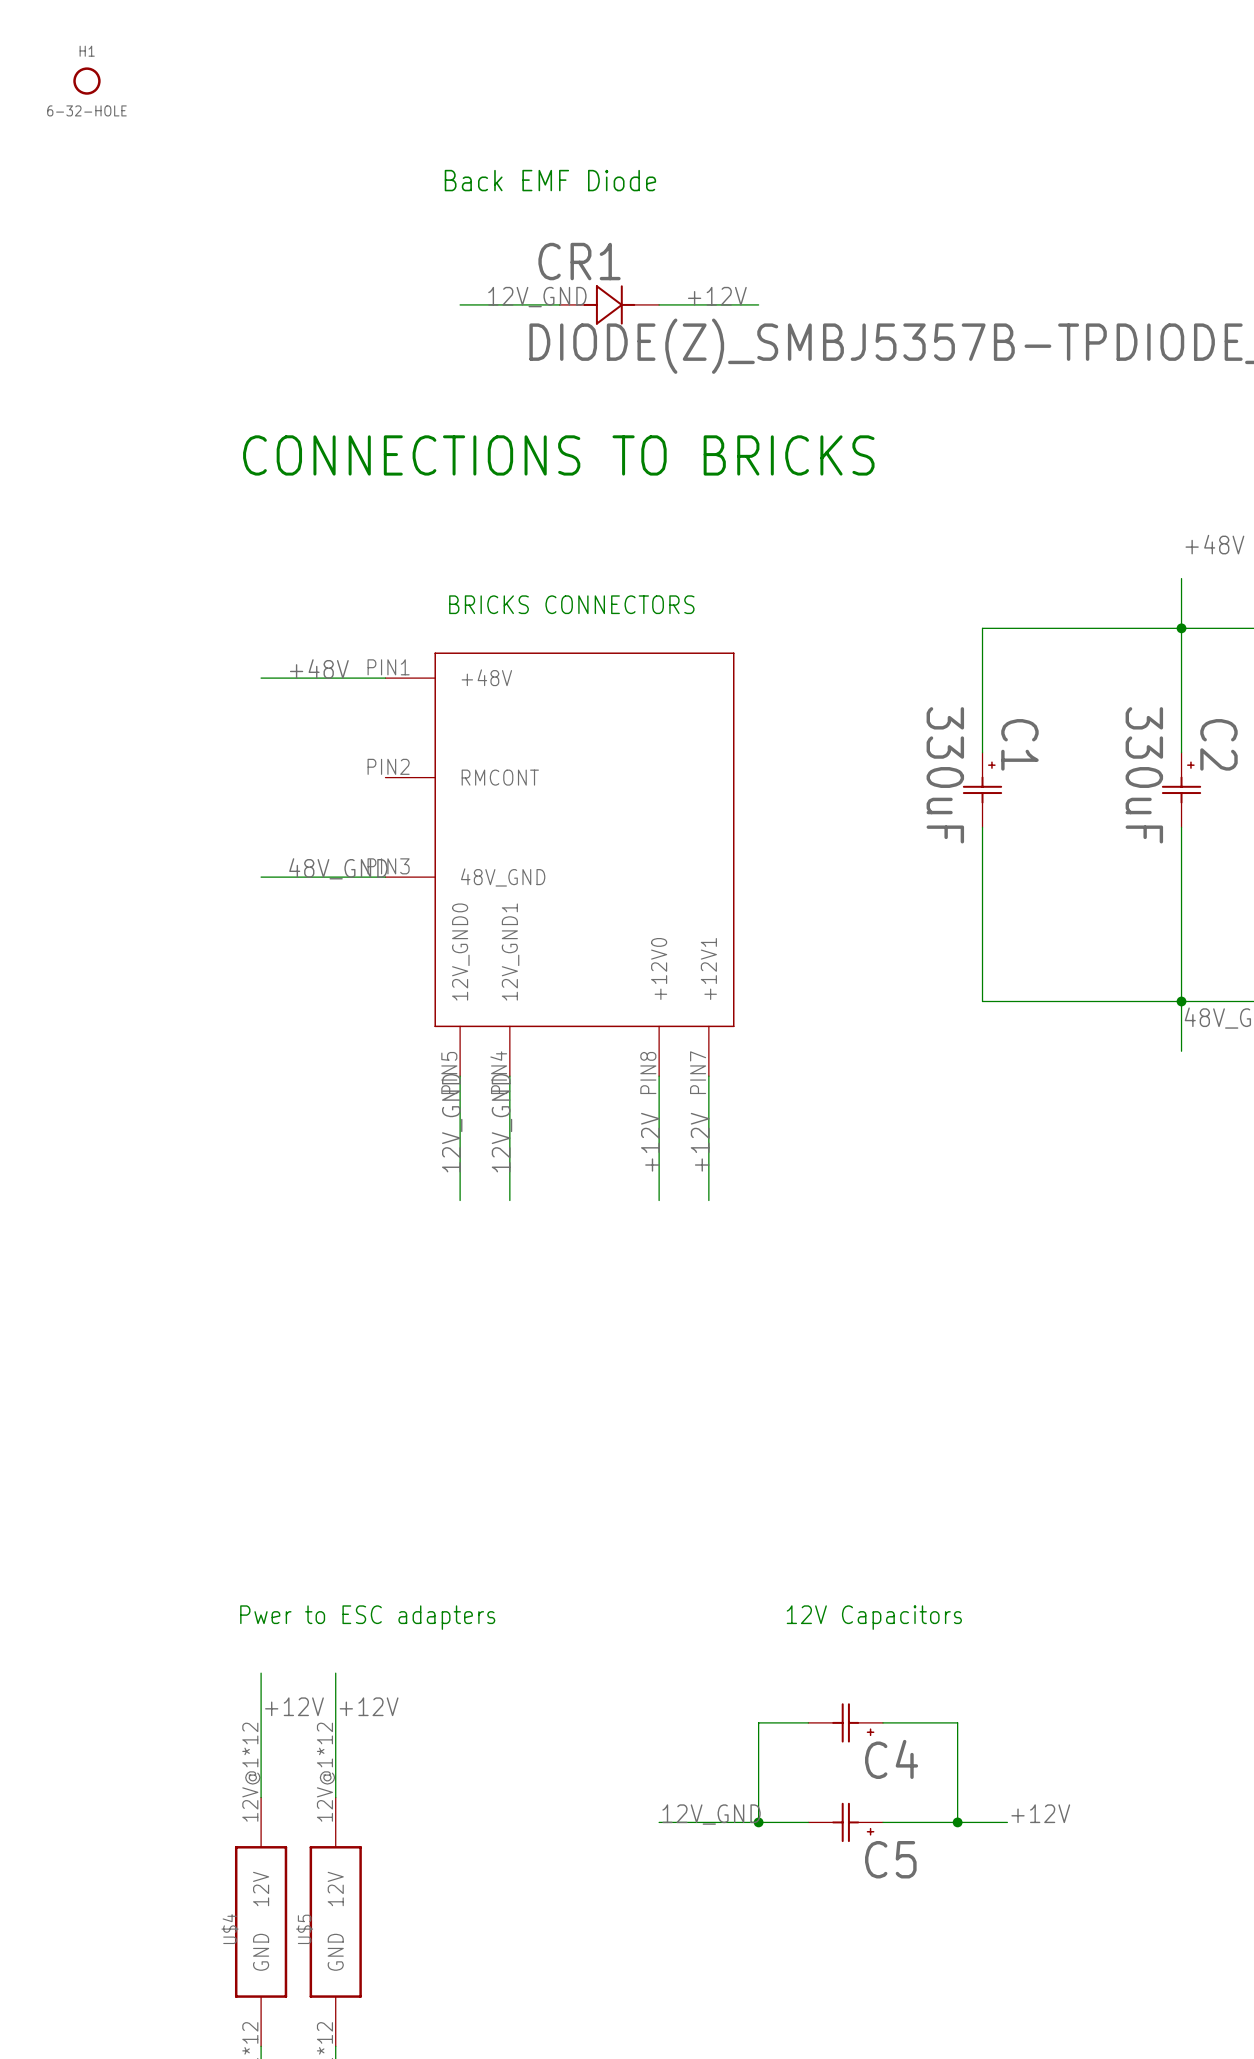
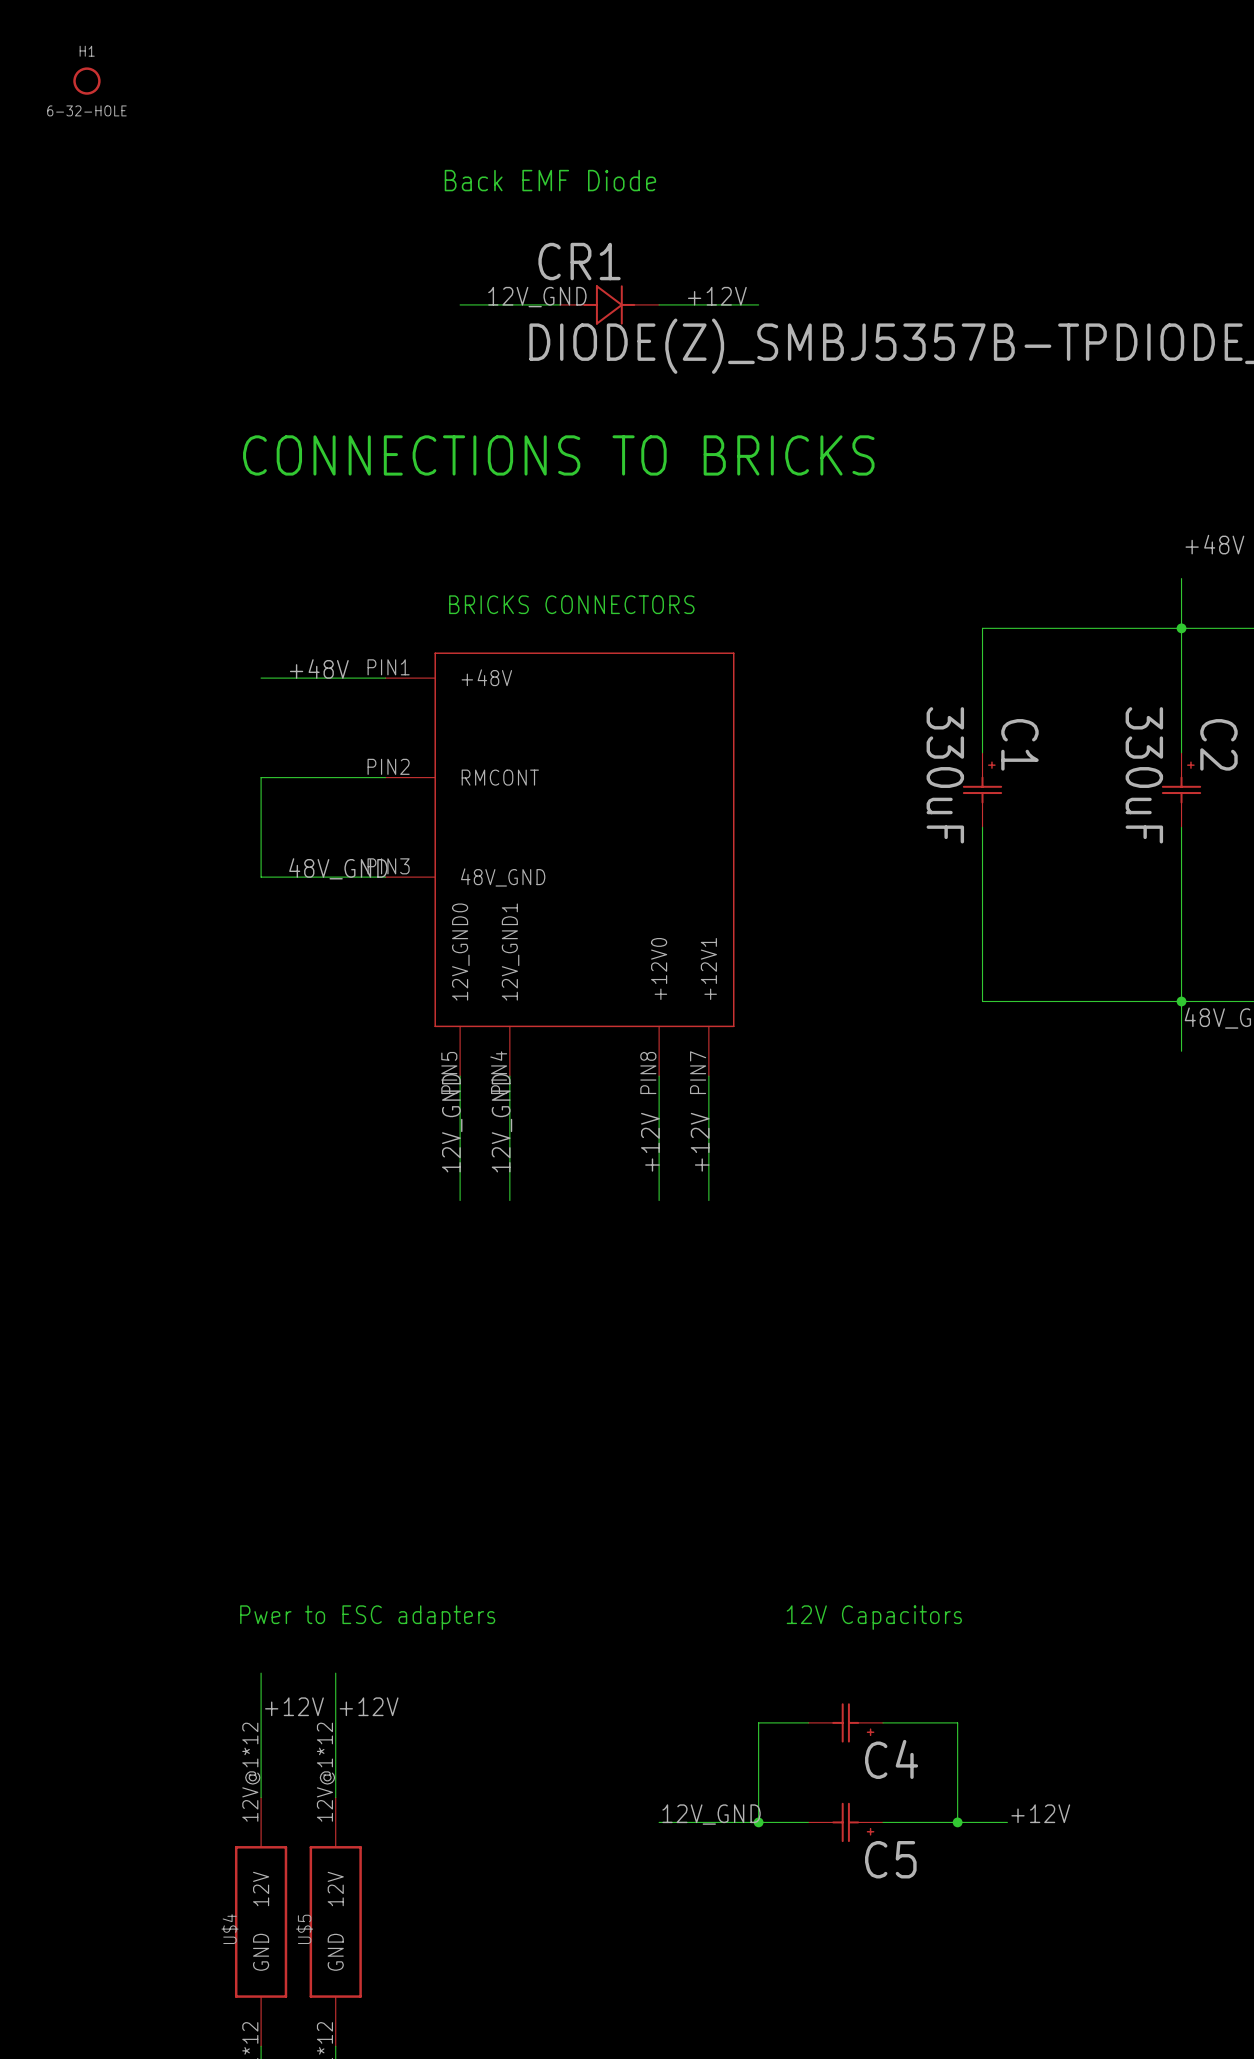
wire: none -> (385, 777) (261, 777) (261, 877)

